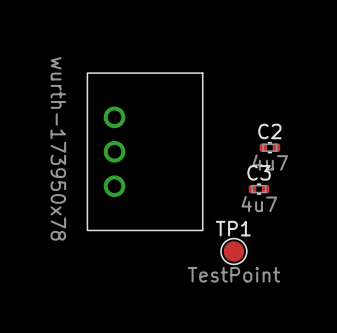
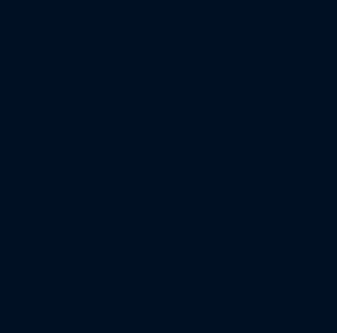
C2: 4u7 (269, 147) -> none
part: (145, 151) -> none
C3: 4u7 (259, 189) -> none
TP1: TestPoint (233, 251) -> none

